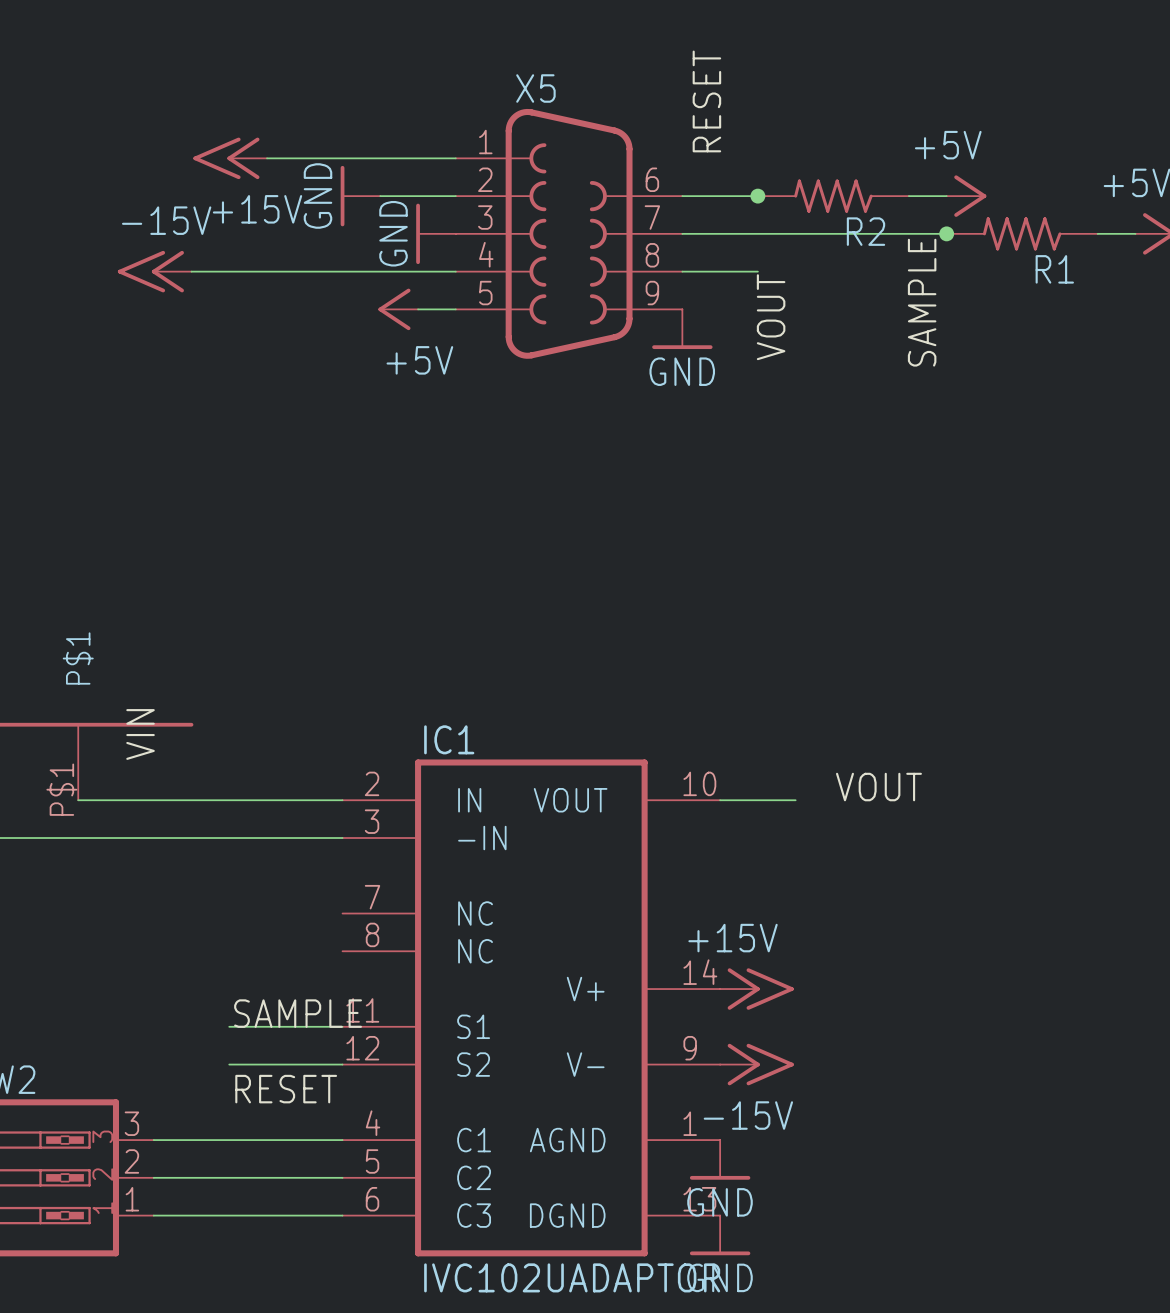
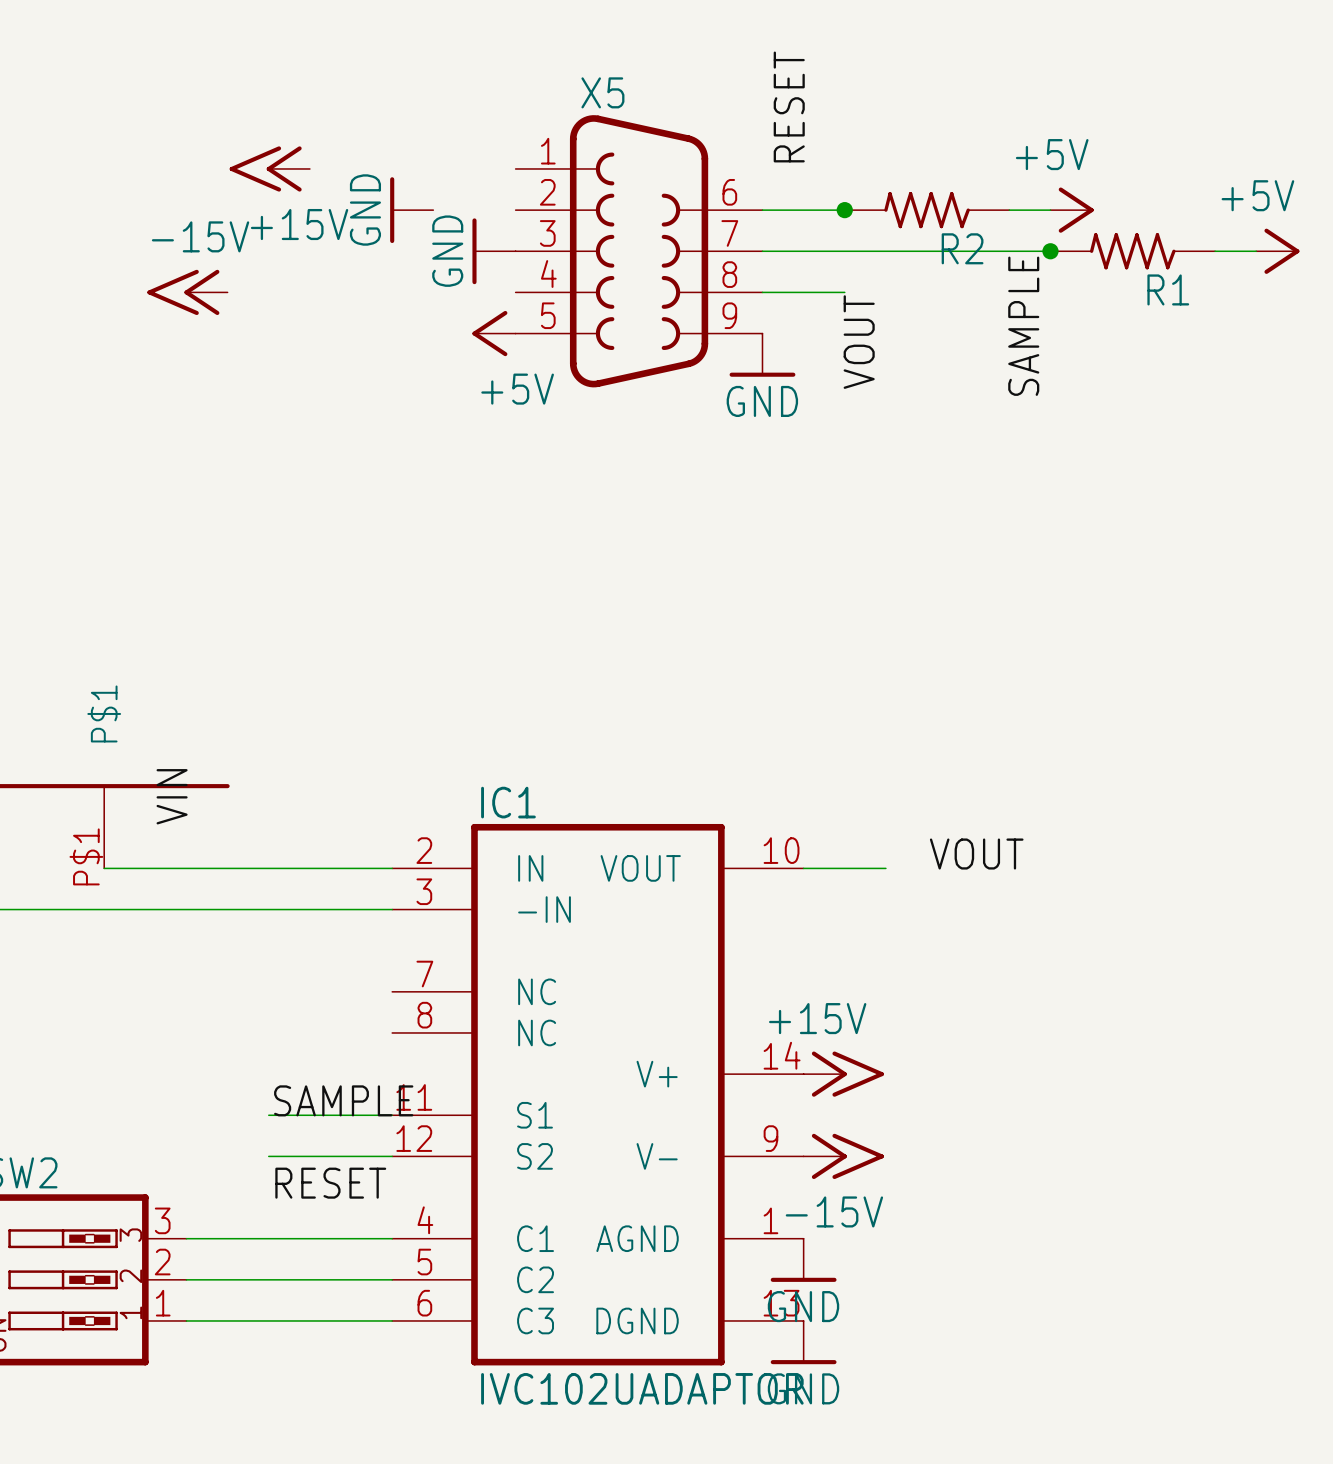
wire: (267, 158) (455, 158) -> none
wire: (380, 196) (455, 196) -> none
wire: (191, 271) (455, 271) -> none
power symbol position: +5V (398, 309) -> +5V (494, 333)

